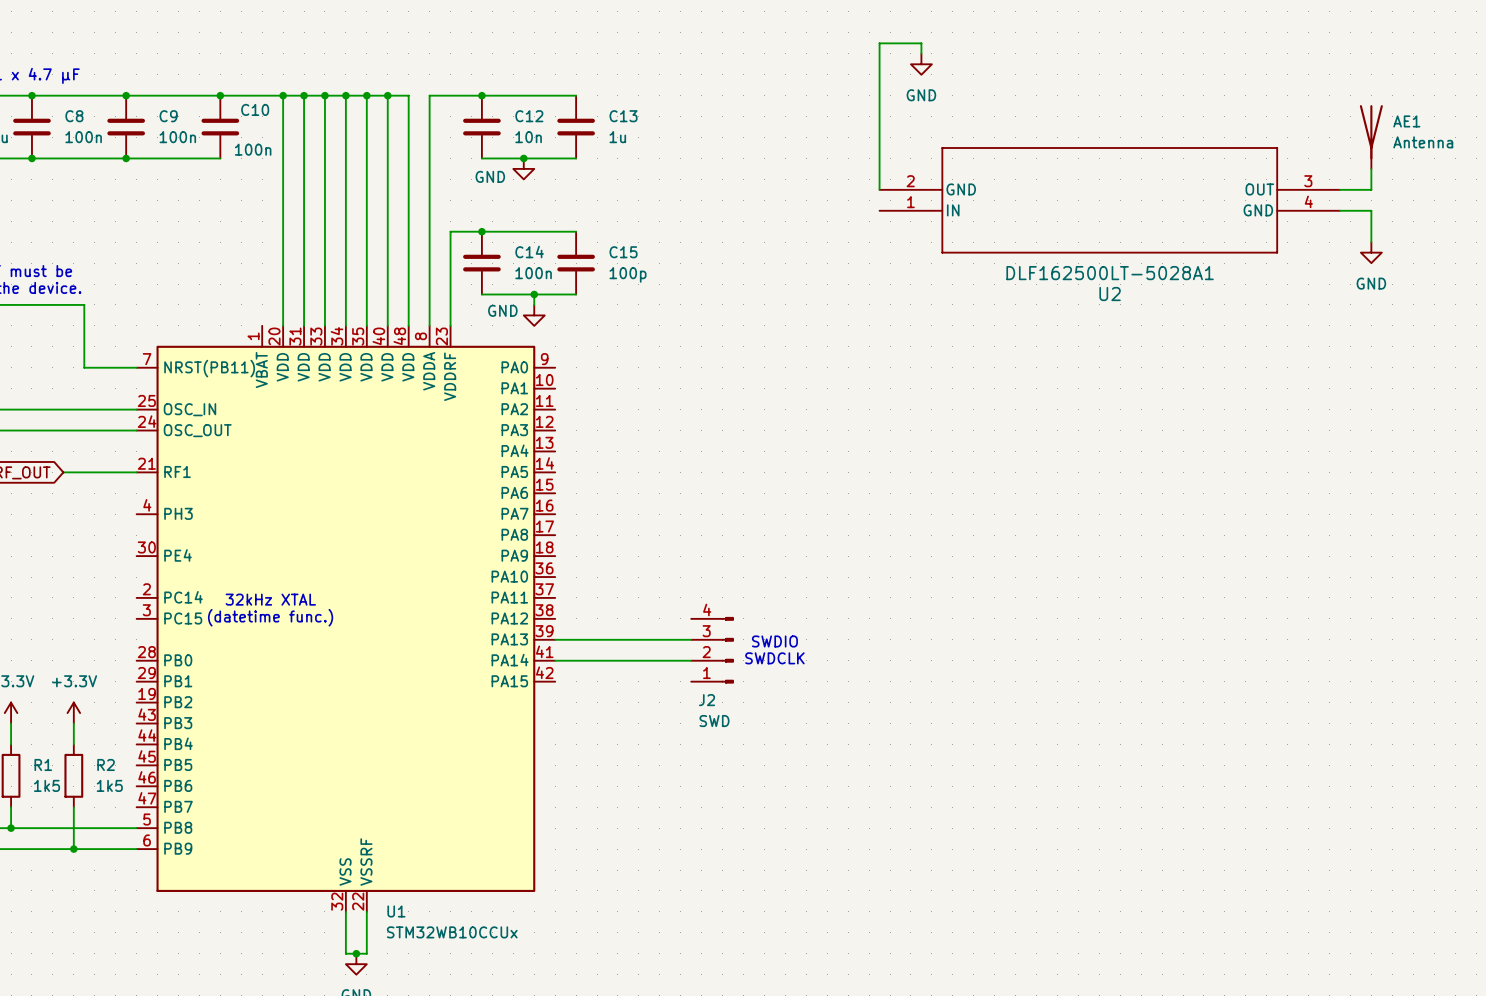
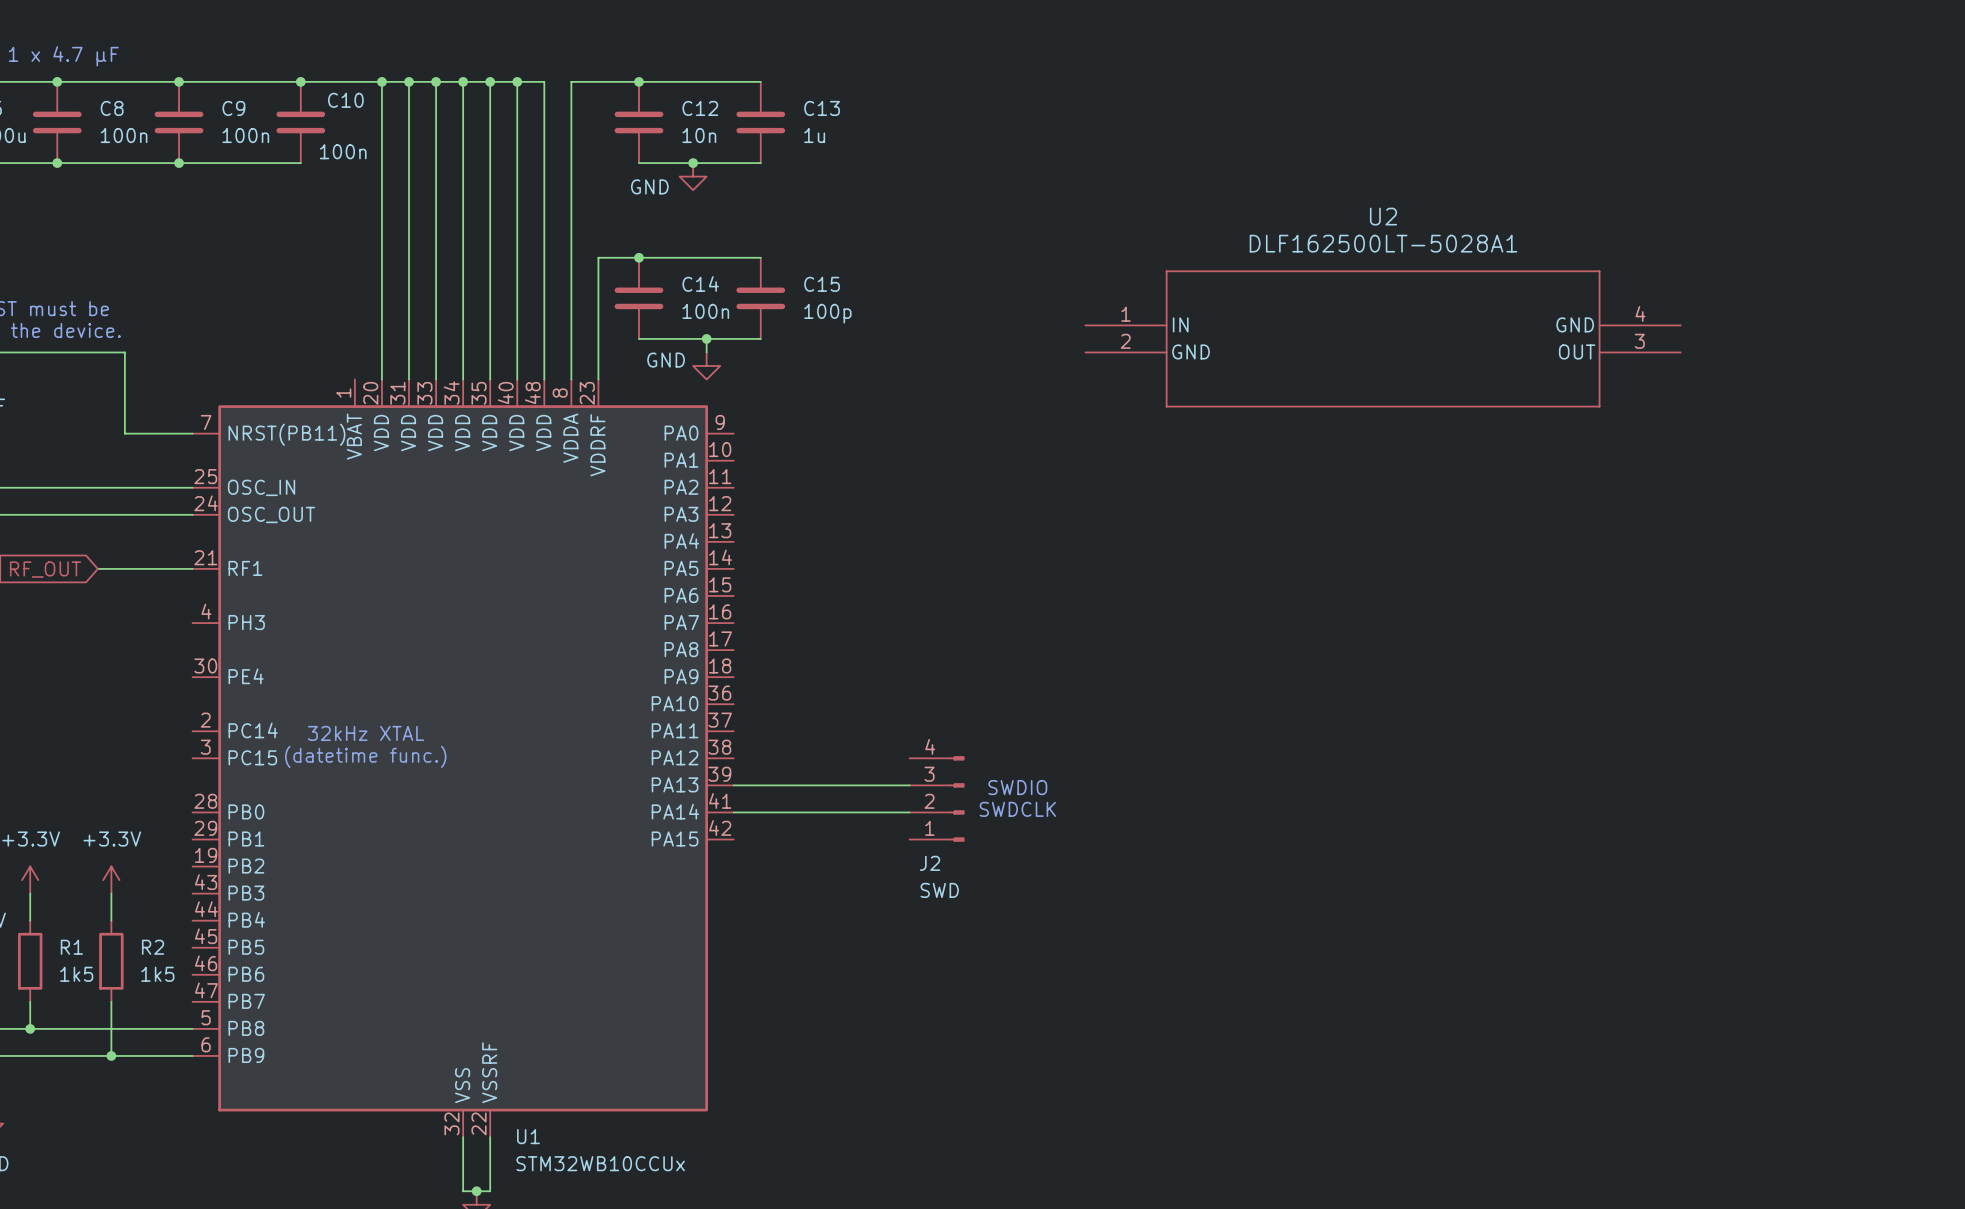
wire: (921, 53) (921, 43) (879, 43) (879, 189) -> none
power symbol: GND (921, 64) -> none
AE1: Antenna (1371, 137) -> none
wire: (1371, 168) (1371, 189) (1339, 189) -> none
U2 flip: as is (1109, 200) -> up-down (1383, 338)
wire: (1339, 210) (1371, 210) (1371, 242) -> none
power symbol: GND (1371, 252) -> none

